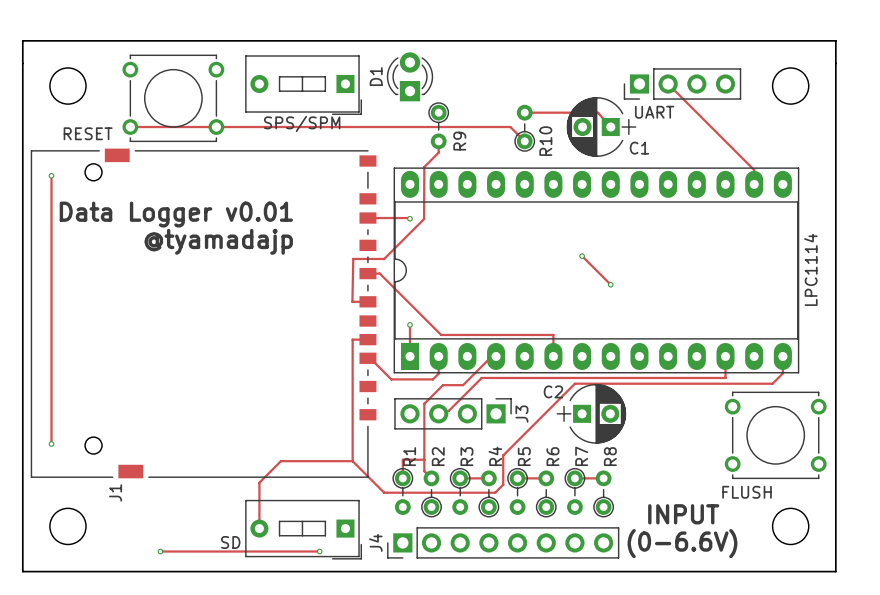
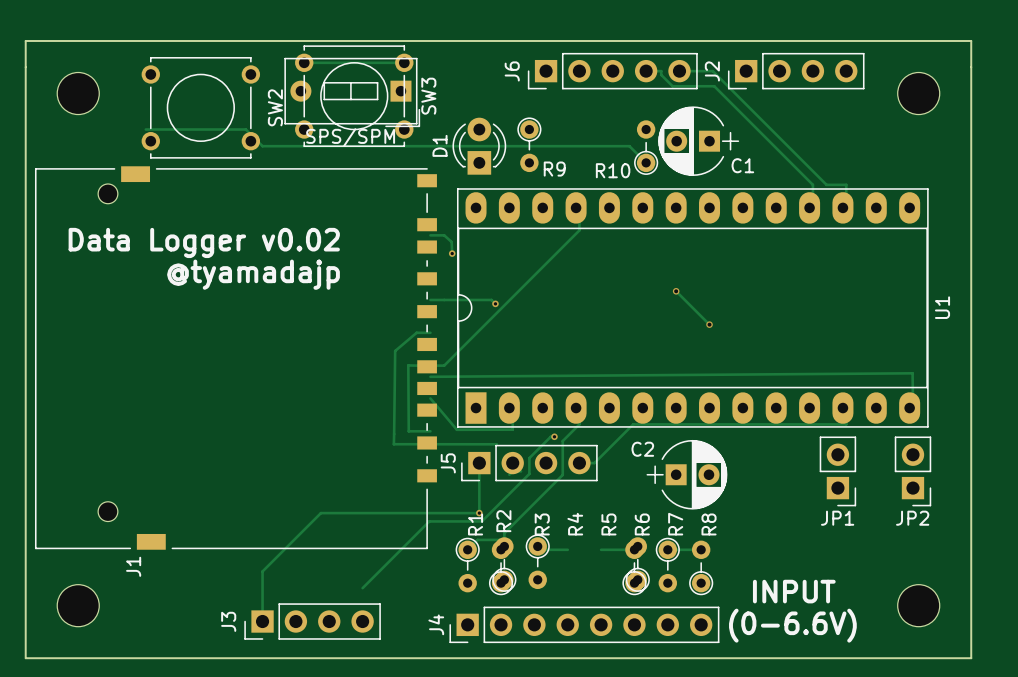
track: none -> (304, 62) (404, 62)
J6: none -> (612, 71)
track: none -> (646, 71) (661, 71) (661, 74) (672, 86) (714, 86) (812, 184) (812, 204)
track: none -> (679, 71) (712, 71) (826, 184) (846, 184) (846, 204)
J2: none -> (796, 71)
D1 position: (410, 76) -> (479, 146)
track: (668, 84) (754, 170) (754, 184) -> none
UART: (682, 84) -> none
SW3: none -> (354, 96)
track: (524, 112) (597, 112) (610, 127) -> none
track: none -> (145, 129) (245, 129) (262, 146) (629, 146) (646, 162)
R9 position: (438, 125) -> (529, 144)
track: (130, 127) (510, 127) (524, 141) -> none
R10 position: (524, 128) -> (646, 147)
RESET name: RESET (88, 133) -> SW2 (275, 107)
track: (438, 141) (438, 152) (424, 166) (424, 219) (383, 259) -> none
R9 name rotation: 0° (459, 141) -> 90° clockwise (554, 169)
R10 name rotation: 0° (545, 141) -> 90° clockwise (613, 170)
track: (51, 175) (51, 443) -> none
via: (51, 175) -> none
track: none -> (579, 204) (579, 230) (444, 365) (408, 365) (408, 431) (430, 431)
track: none -> (430, 235) (444, 235) (451, 241) (452, 253)
text: Data Logger v0.01 (176, 214) -> Data Logger v0.02 (204, 242)
track: (367, 218) (410, 218) -> none
via: (410, 218) -> none
via: none -> (452, 253)
track: (384, 258) (353, 258) (352, 301) (367, 301) -> none
track: none -> (430, 299) (491, 299) (495, 303)
via: none -> (495, 303)
LPC1114 name: LPC1114 (810, 269) -> U1 (942, 307)
track: (367, 273) (379, 273) (441, 334) (553, 334) (553, 356) -> none
track: none -> (430, 332) (416, 332) (395, 350) (393, 444) (496, 444)
track: (410, 324) (410, 356) -> none
via: (410, 324) -> none
track: none -> (430, 376) (912, 373) (912, 404)
track: (367, 339) (352, 339) (352, 461) -> none
track: none -> (430, 398) (456, 429) (512, 429) (512, 404)
track: (494, 353) (463, 385) (443, 385) (424, 403) (424, 471) (431, 478) -> none
track: none -> (579, 404) (579, 424) (562, 441) (562, 474) (504, 533) (504, 546)
track: none -> (846, 404) (846, 424) (633, 424) (594, 463) (579, 463)
track: (438, 356) (438, 373) (432, 379) (391, 379) (370, 358) (367, 358) -> none
track: (725, 356) (725, 377) (481, 377) (448, 411) -> none
track: (782, 356) (782, 373) (772, 383) (574, 383) (503, 455) (503, 484) (495, 492) (384, 492) (352, 461) -> none
track: none -> (554, 436) (550, 436) (529, 458) (529, 473) (481, 521) (429, 521) (362, 588)
via: none -> (554, 436)
track: none -> (479, 463) (479, 513) (320, 513) (262, 571) (262, 621)
J5: none -> (529, 463)
JP1: none -> (837, 471)
JP2: none -> (912, 471)
J3 rotation: 0° (453, 413) -> 180° (312, 621)
J3 position: (453, 413) -> (312, 621)
FLUSH: (775, 435) -> none
via: (51, 443) -> none
via: none -> (479, 513)
track: (424, 459) (402, 459) (402, 478) -> none
track: (352, 461) (280, 461) (259, 482) (259, 528) -> none
track: none -> (504, 539) (477, 539) (471, 546)
R2 rotation: 0° (460, 491) -> 180° (504, 564)
R3 position: (517, 491) -> (537, 561)
R6 position: (488, 493) -> (637, 564)
SD: (303, 529) -> none
track: (160, 551) (319, 551) -> none
via: (160, 551) -> none
via: (319, 551) -> none

